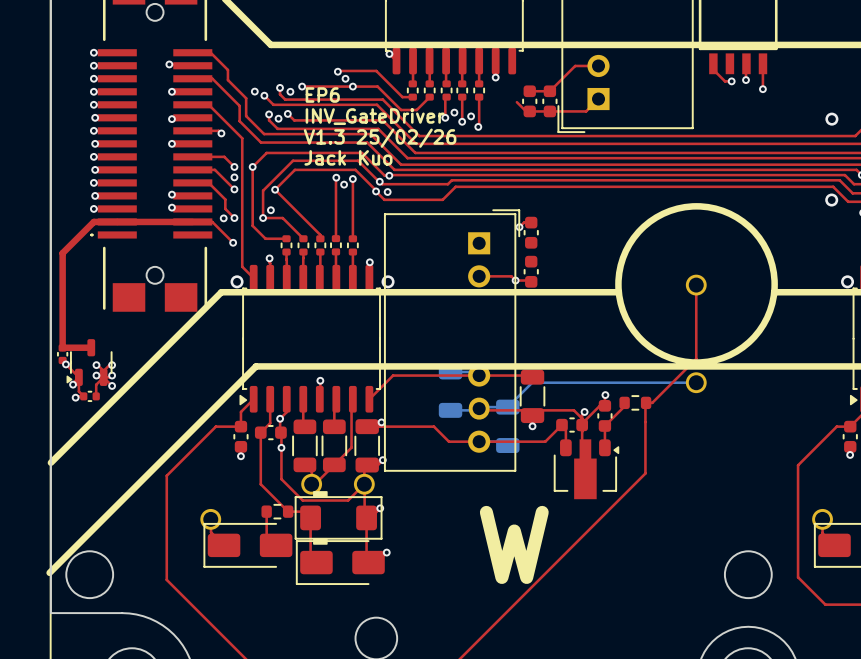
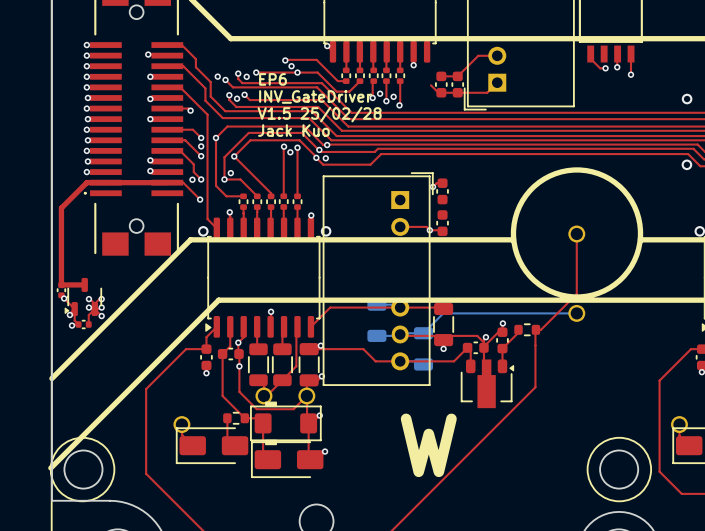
text: V1.3 25/02/26 (380, 138) -> V1.5 25/02/28 (319, 114)
drawing: none -> [50, 437, 115, 502]
drawing: none -> [587, 437, 652, 502]

